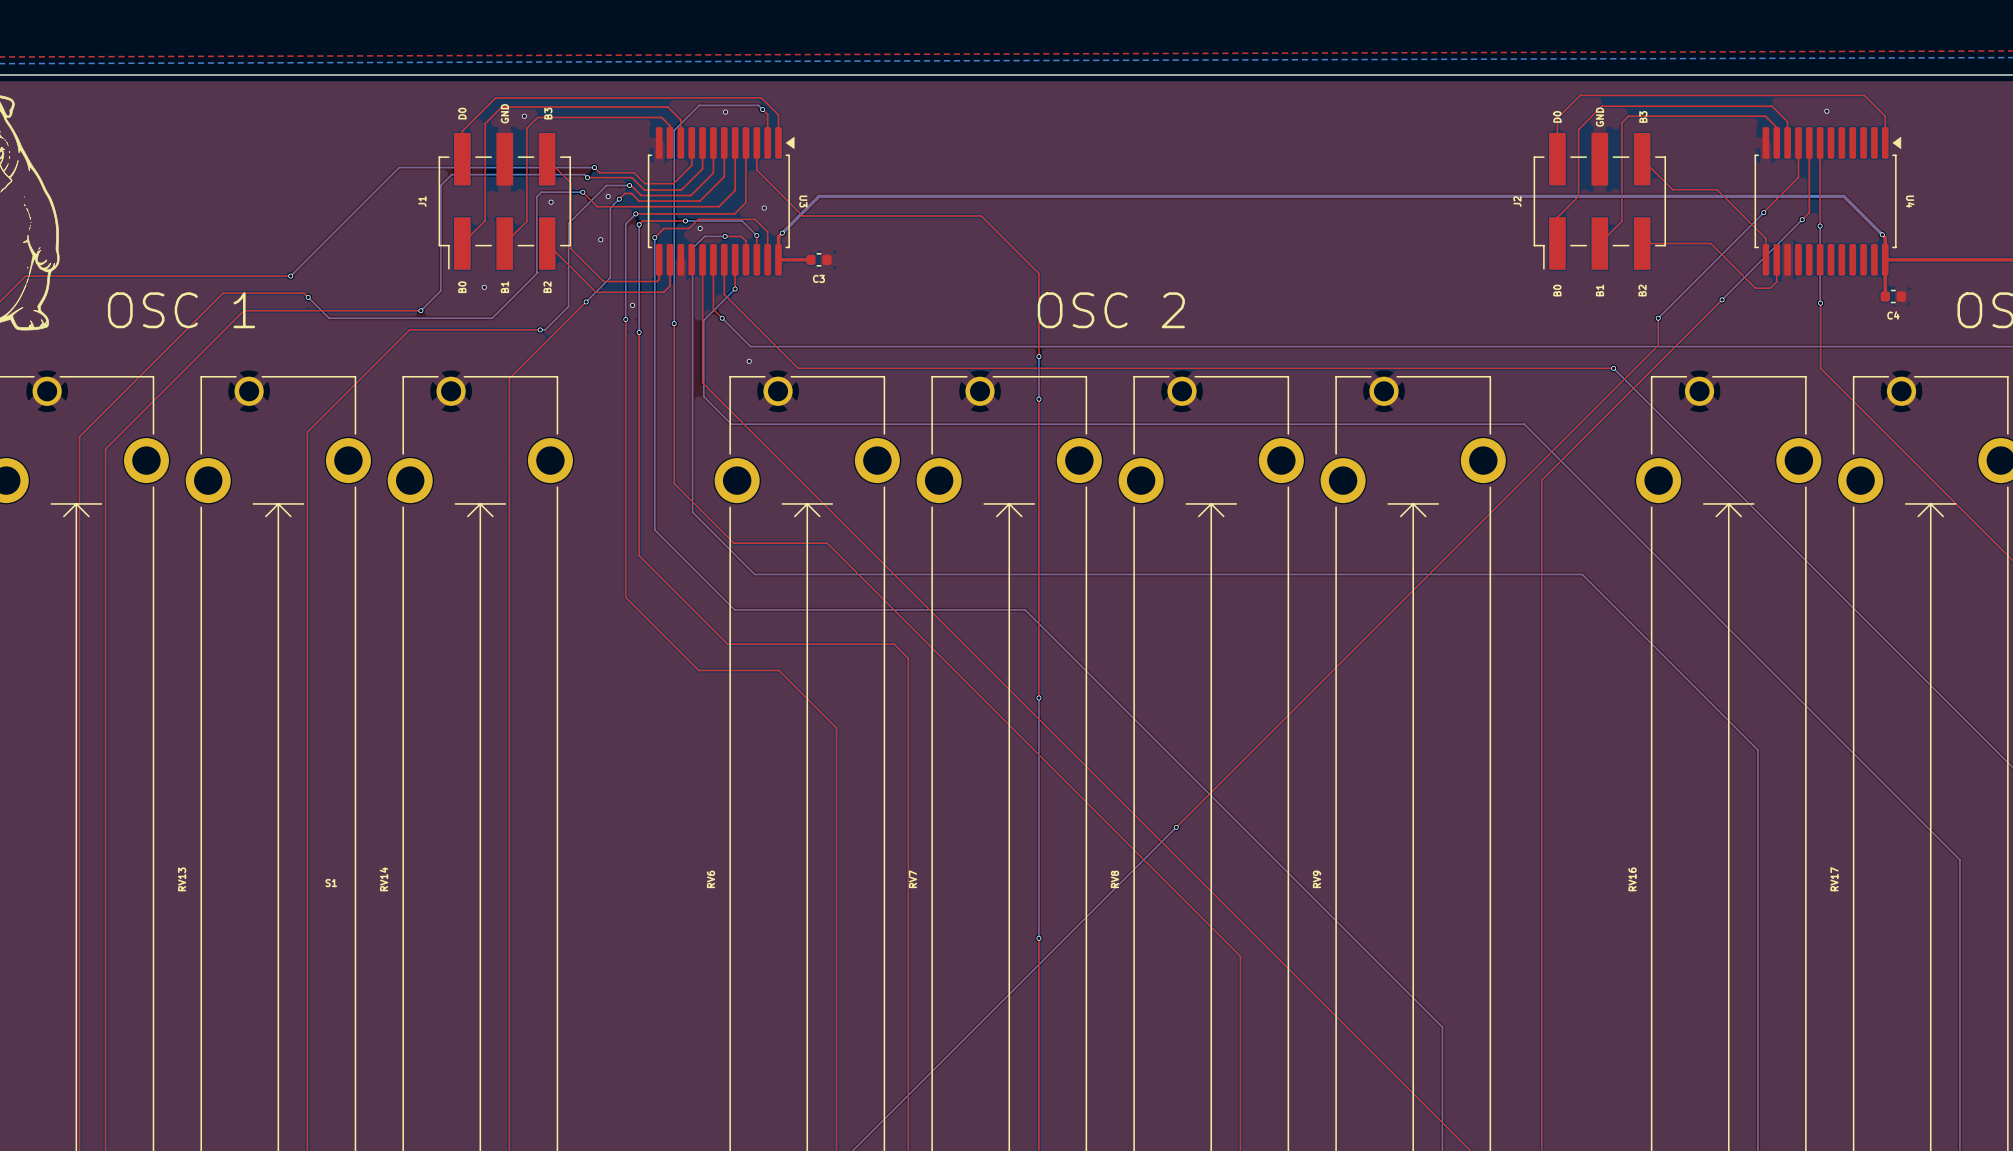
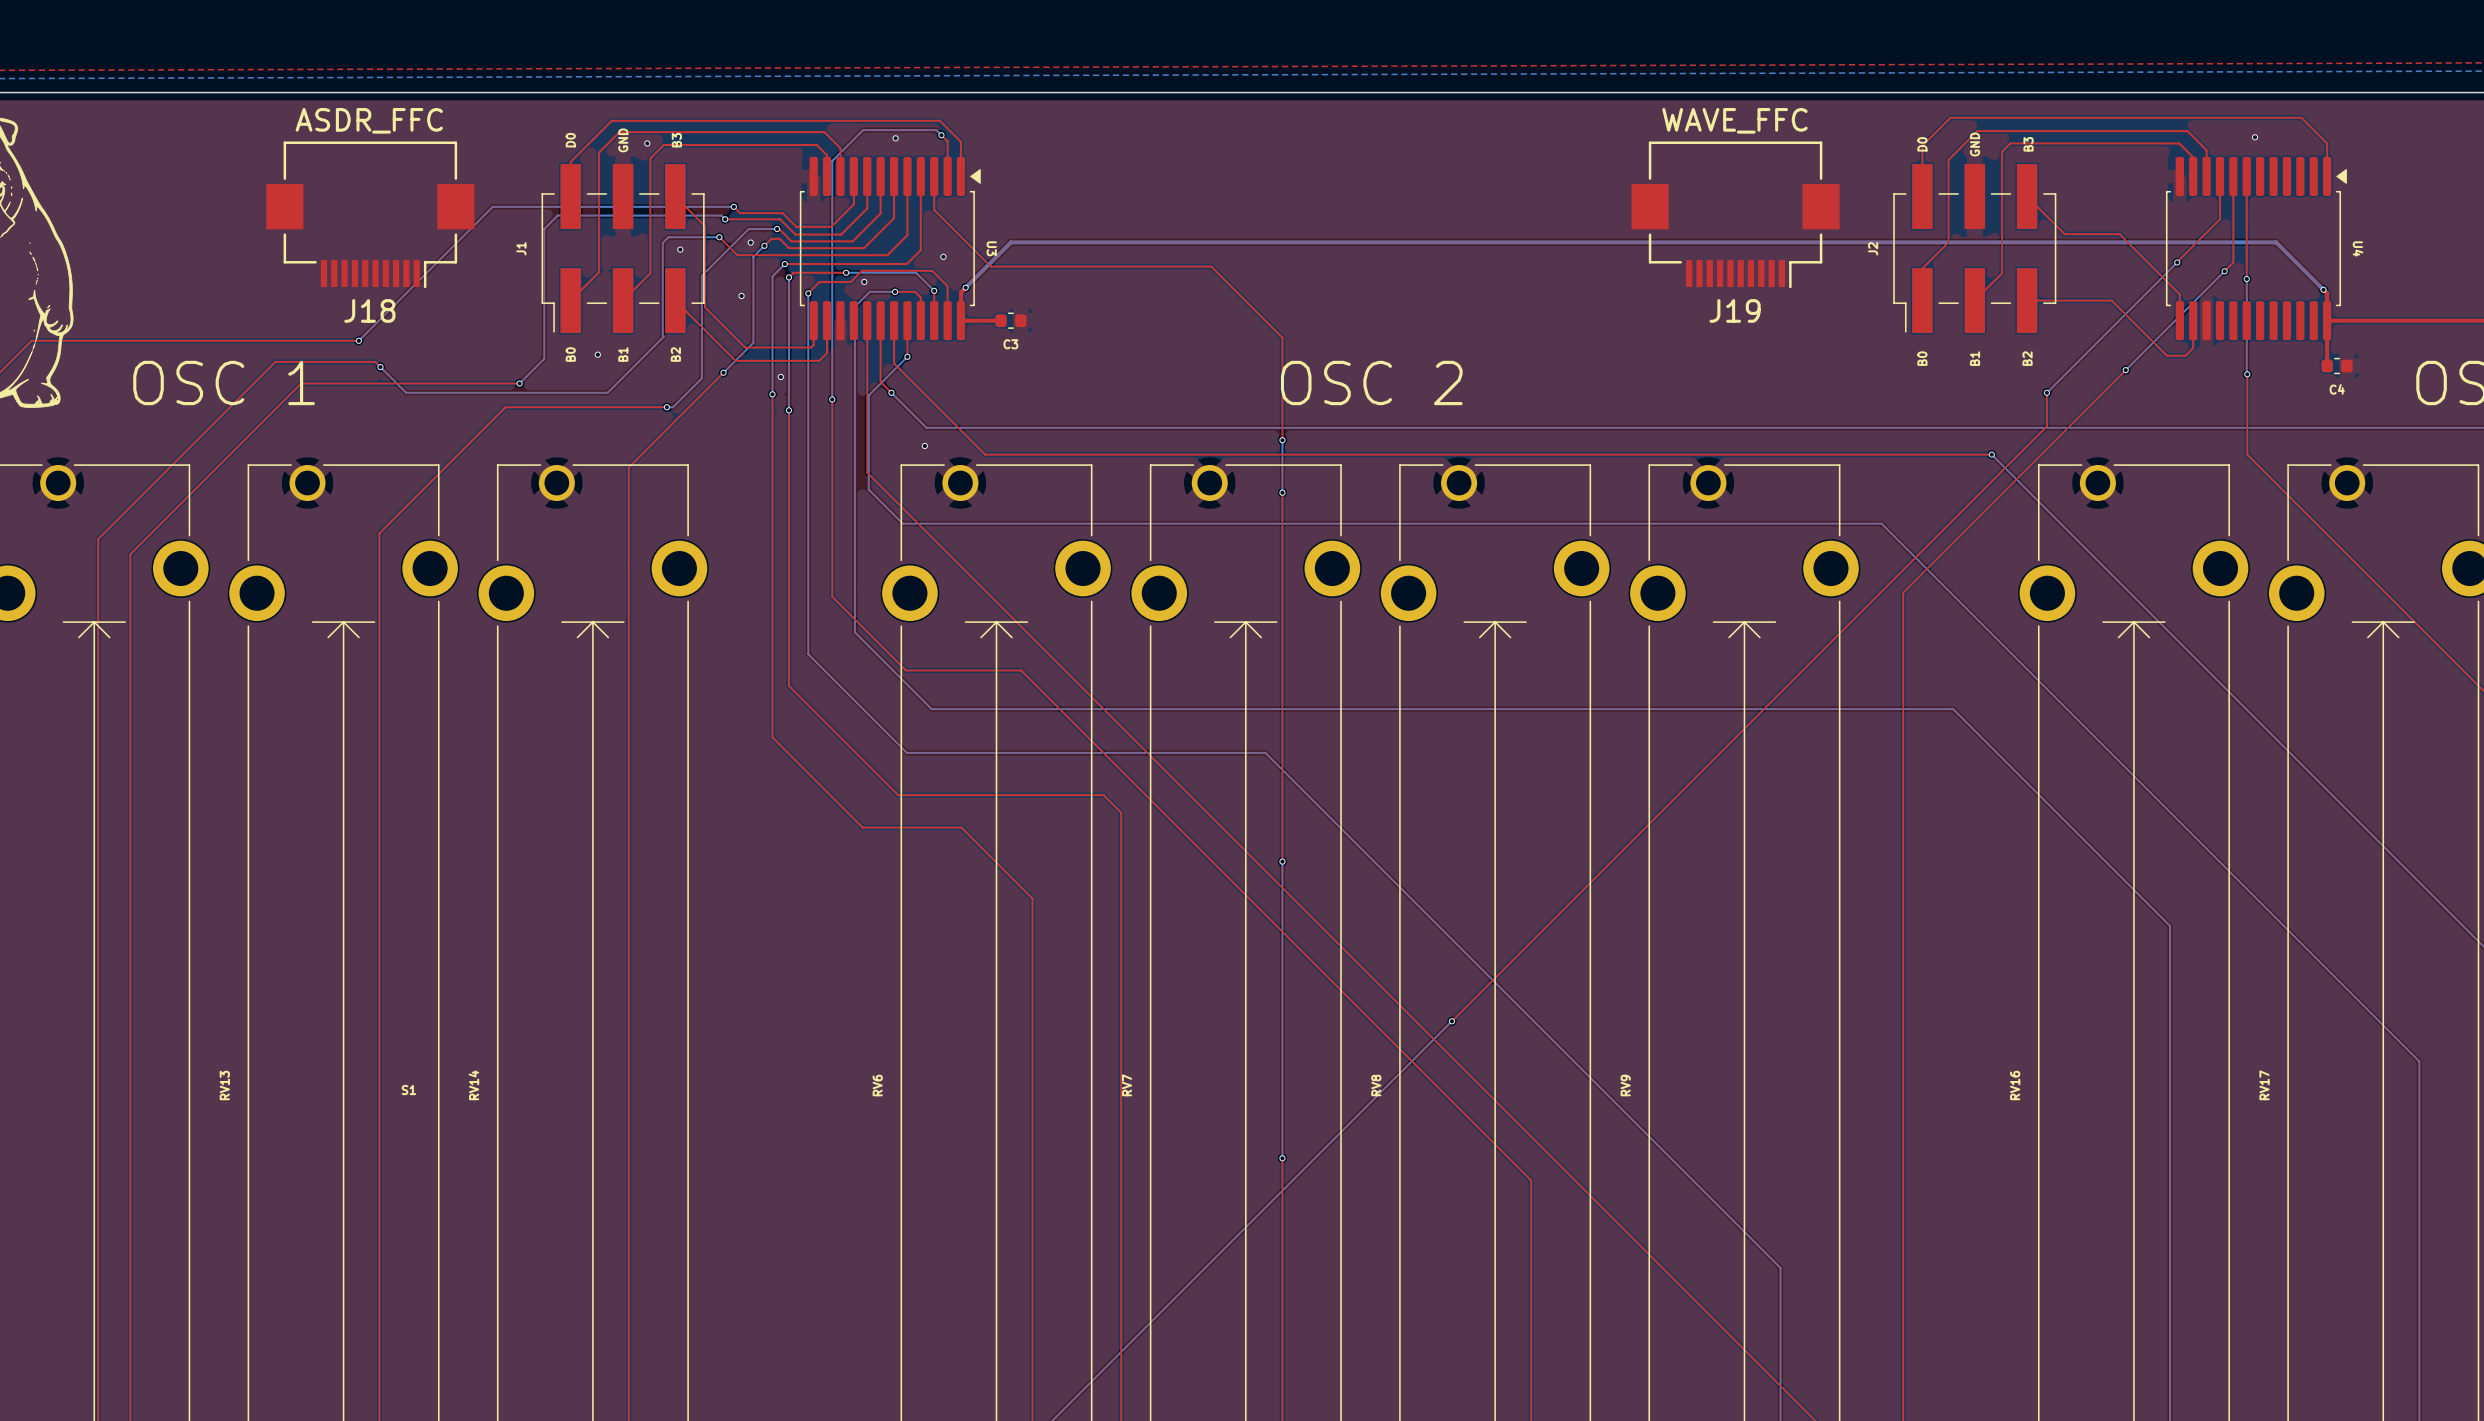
text: none -> ASDR_FFC (369, 120)
text: none -> WAVE_FFC (1734, 120)
J18: none -> (370, 214)
J19: none -> (1735, 214)

